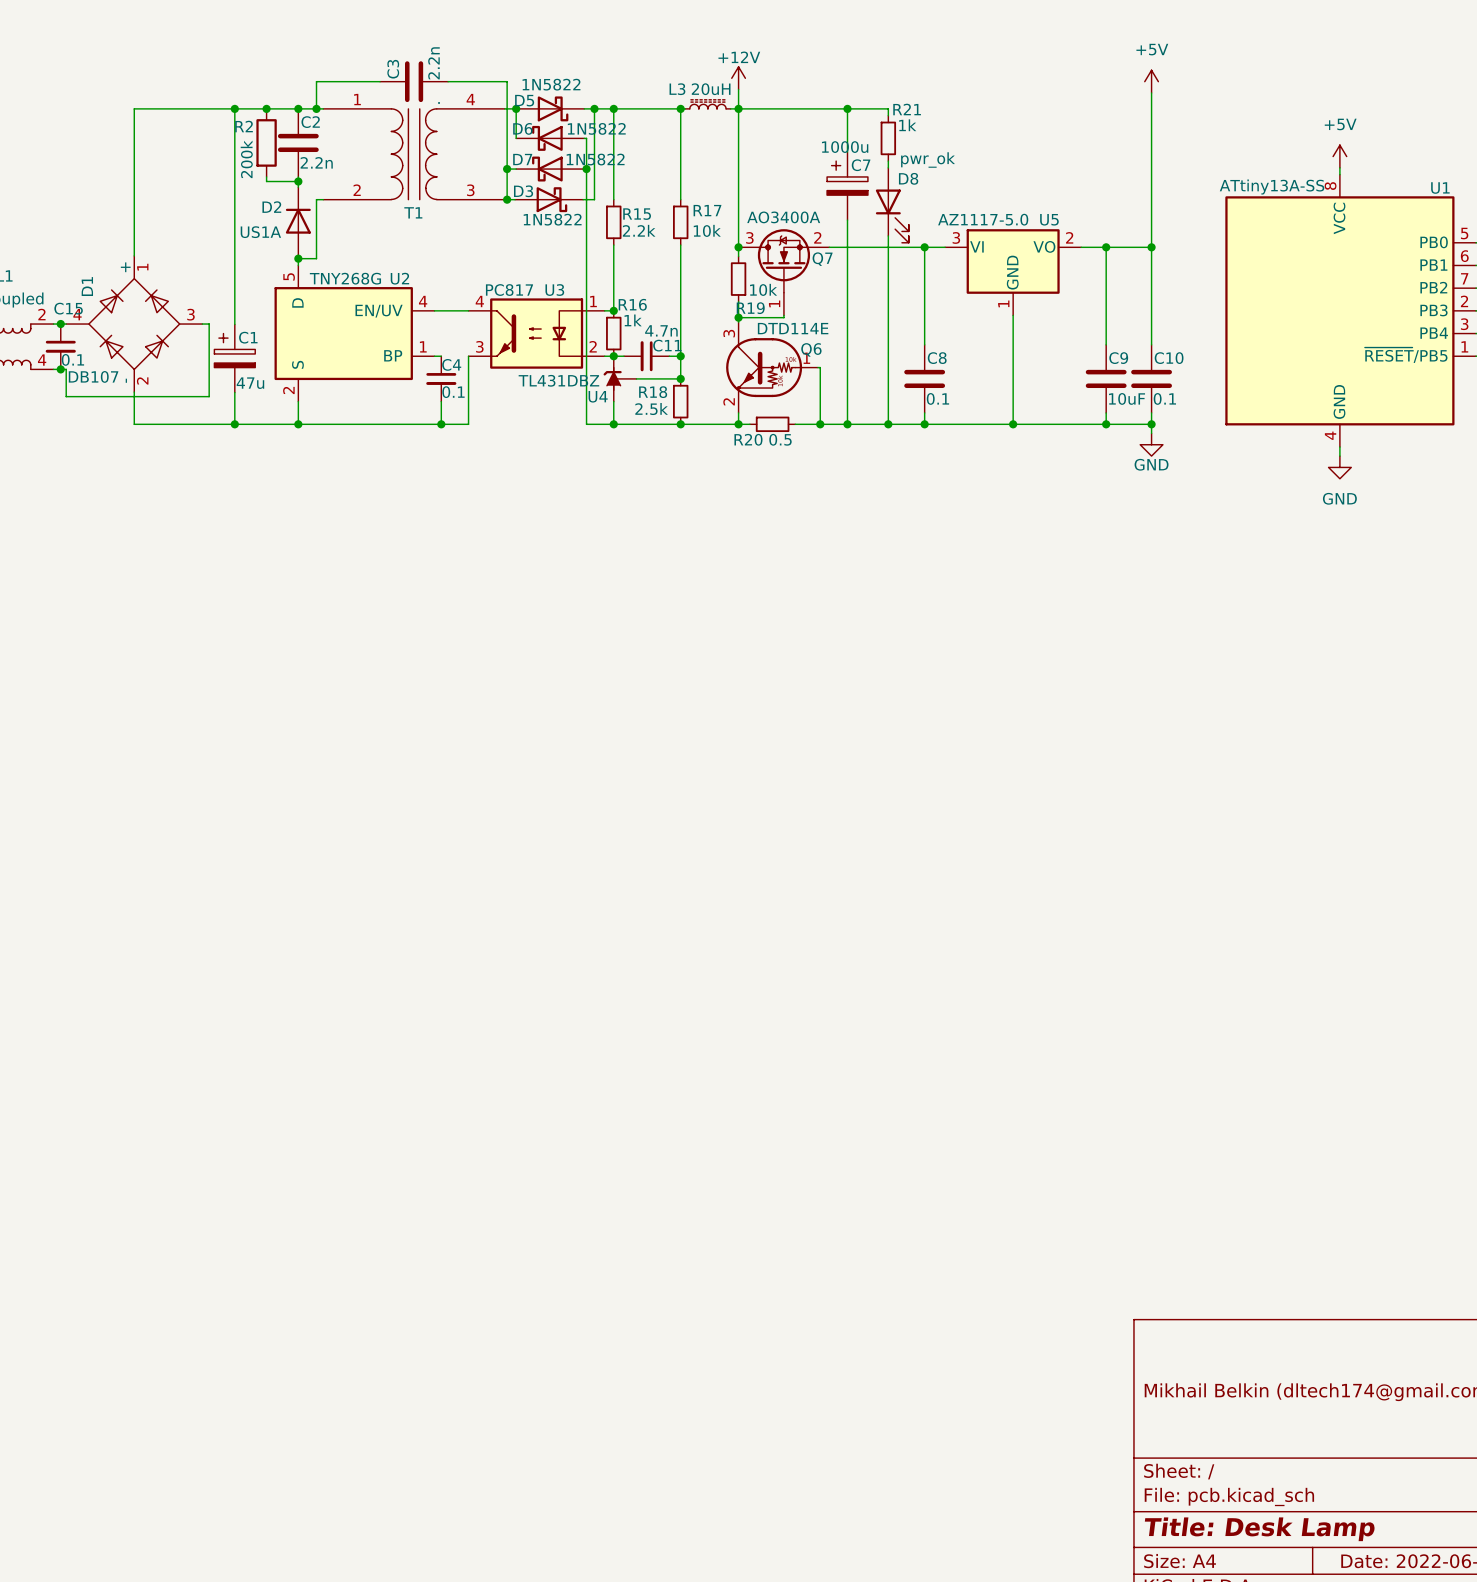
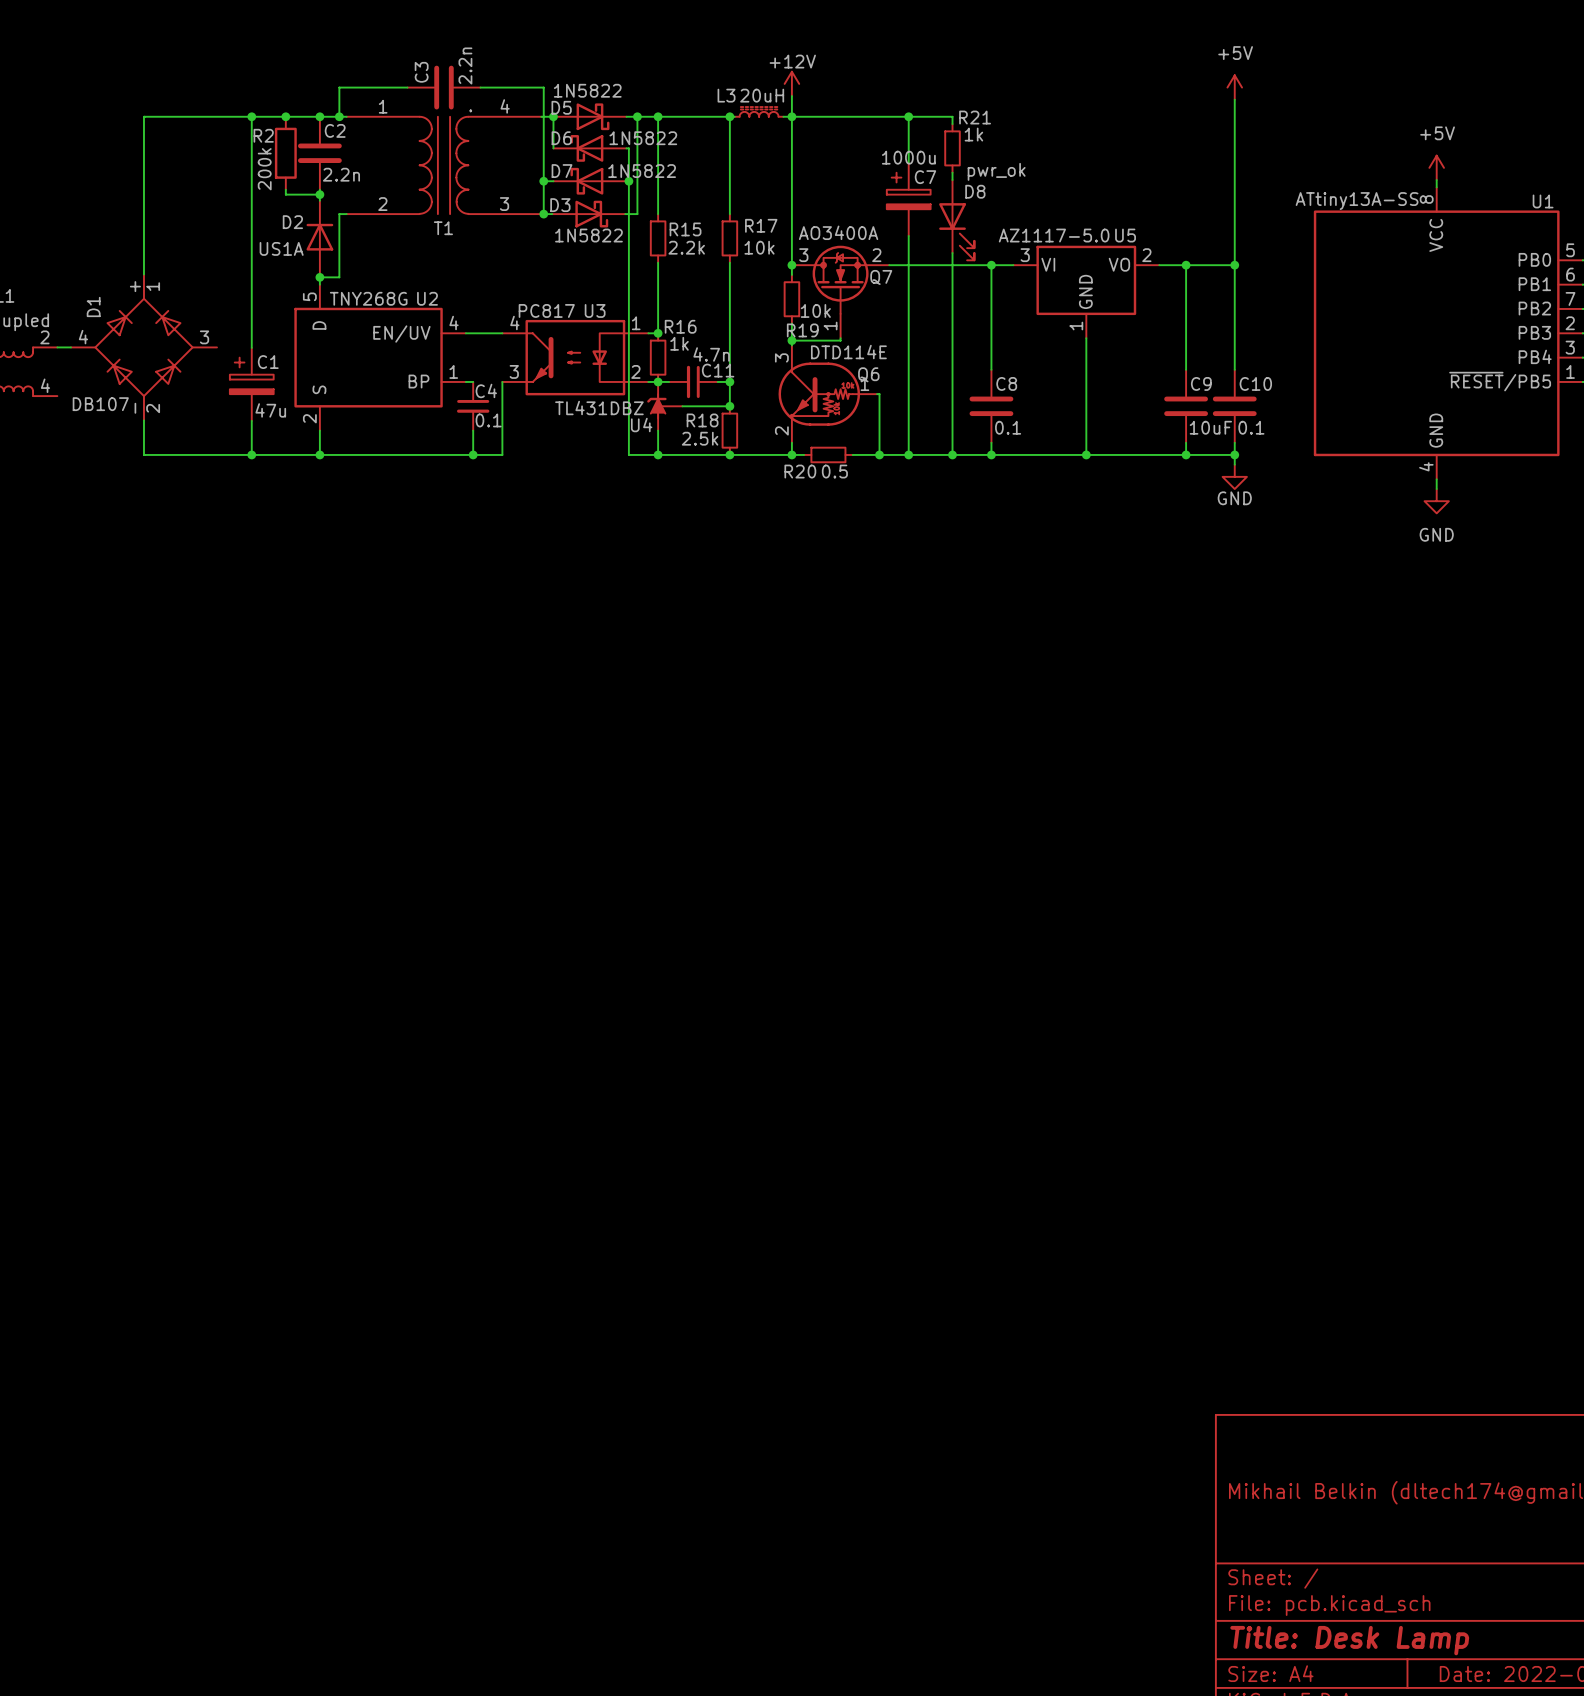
junction: (60, 324) -> none
wire: (202, 324) (209, 324) (209, 396) (66, 396) (66, 369) (53, 369) -> none
C15: 0.1 (60, 346) -> none
junction: (60, 369) -> none

